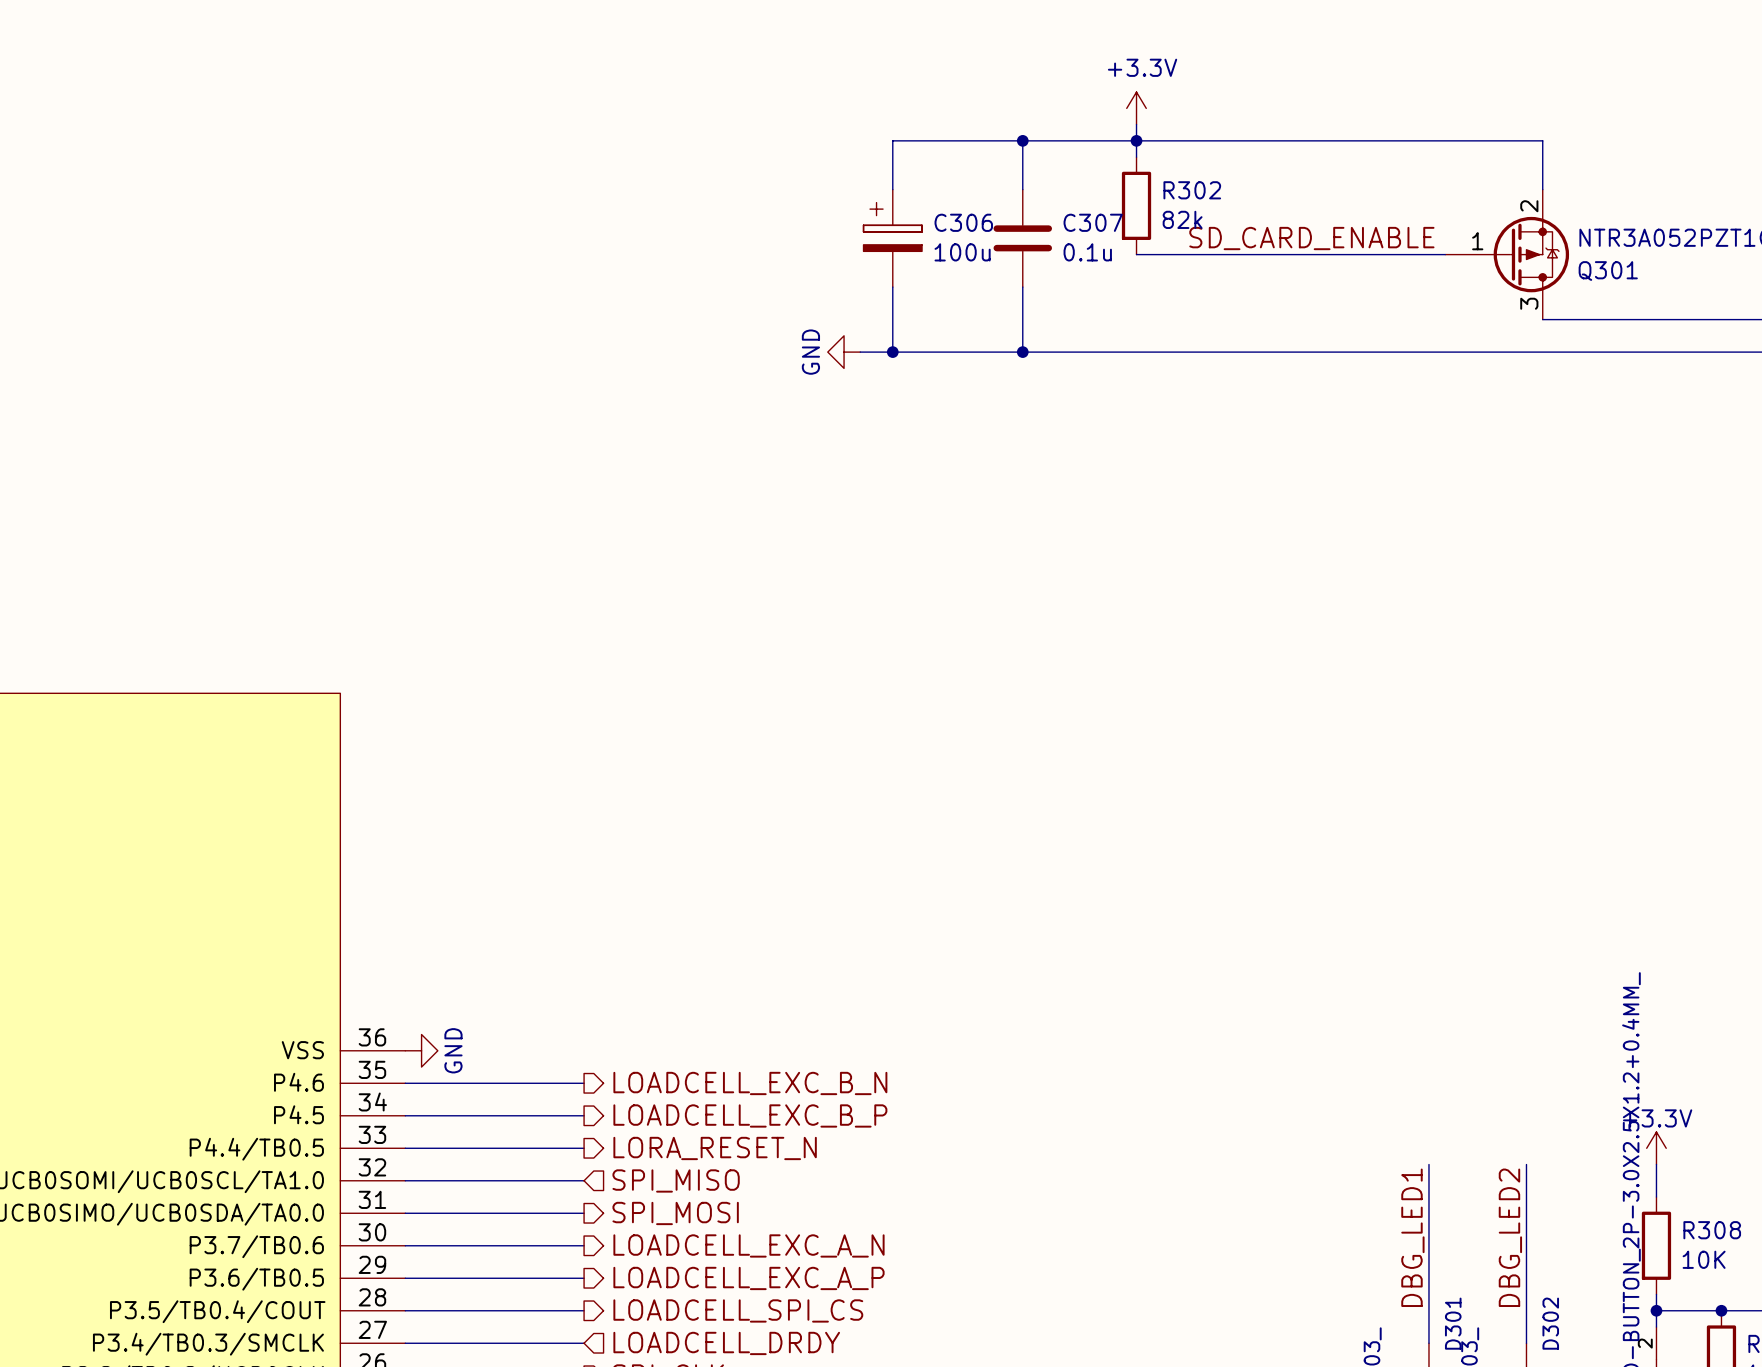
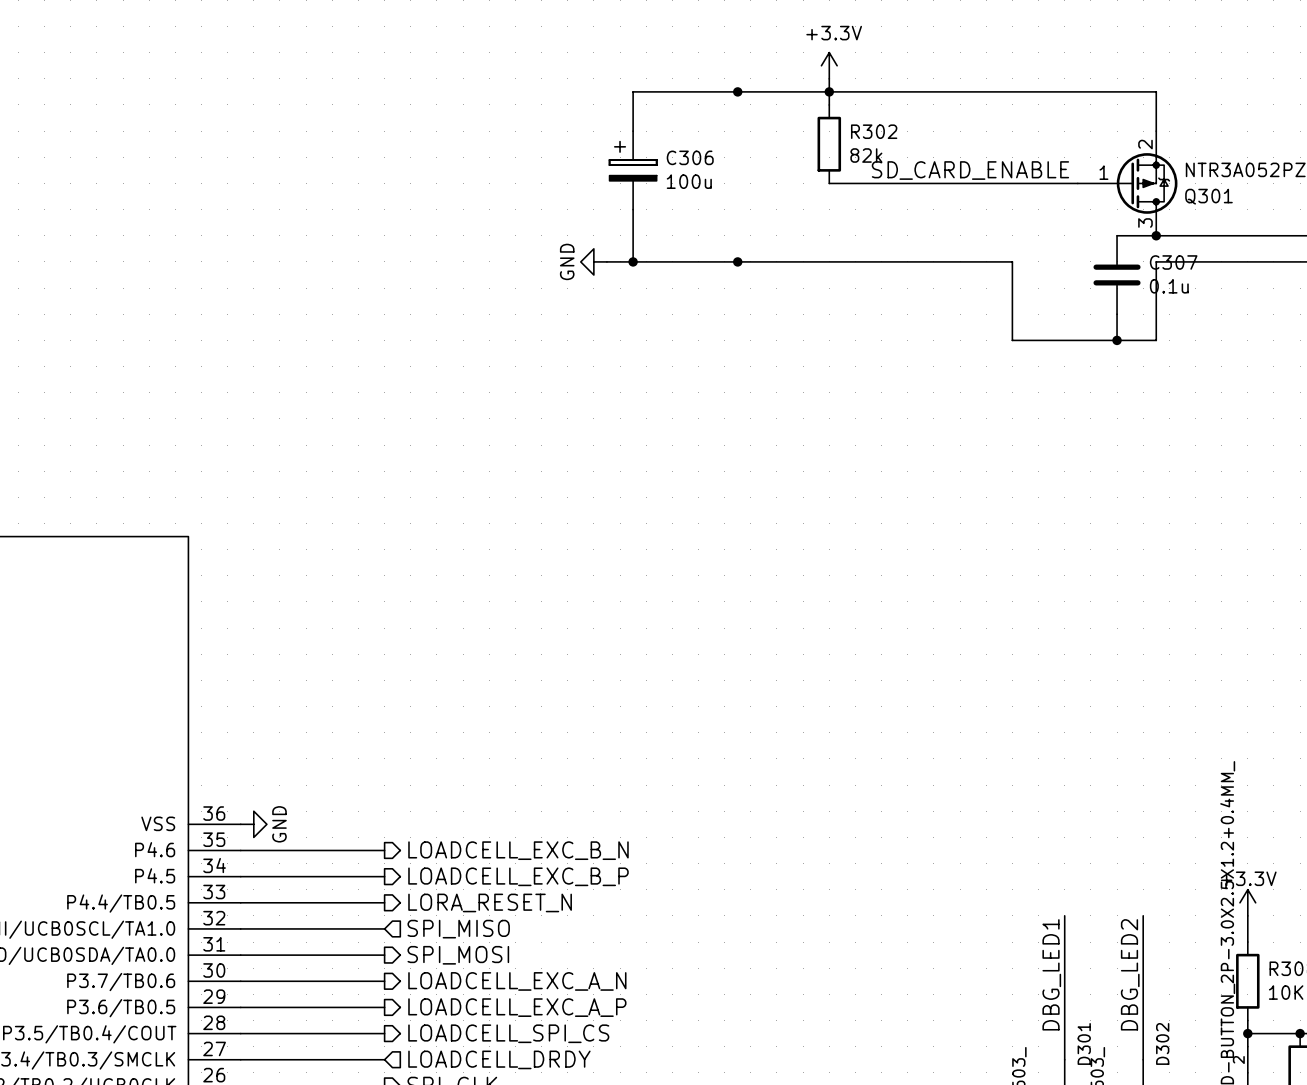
wire: (1022, 140) (1022, 189) -> none
C307 position: (1022, 238) -> (1117, 275)
wire: (1022, 287) (1022, 352) -> none
wire: none -> (1117, 235) (1156, 235)
junction: none -> (1156, 235)
wire: (1363, 352) (1542, 352) -> (1012, 261) (1012, 340) (1156, 340) (1156, 261)
wire: none -> (1117, 314) (1117, 340)
junction: none -> (1117, 340)

